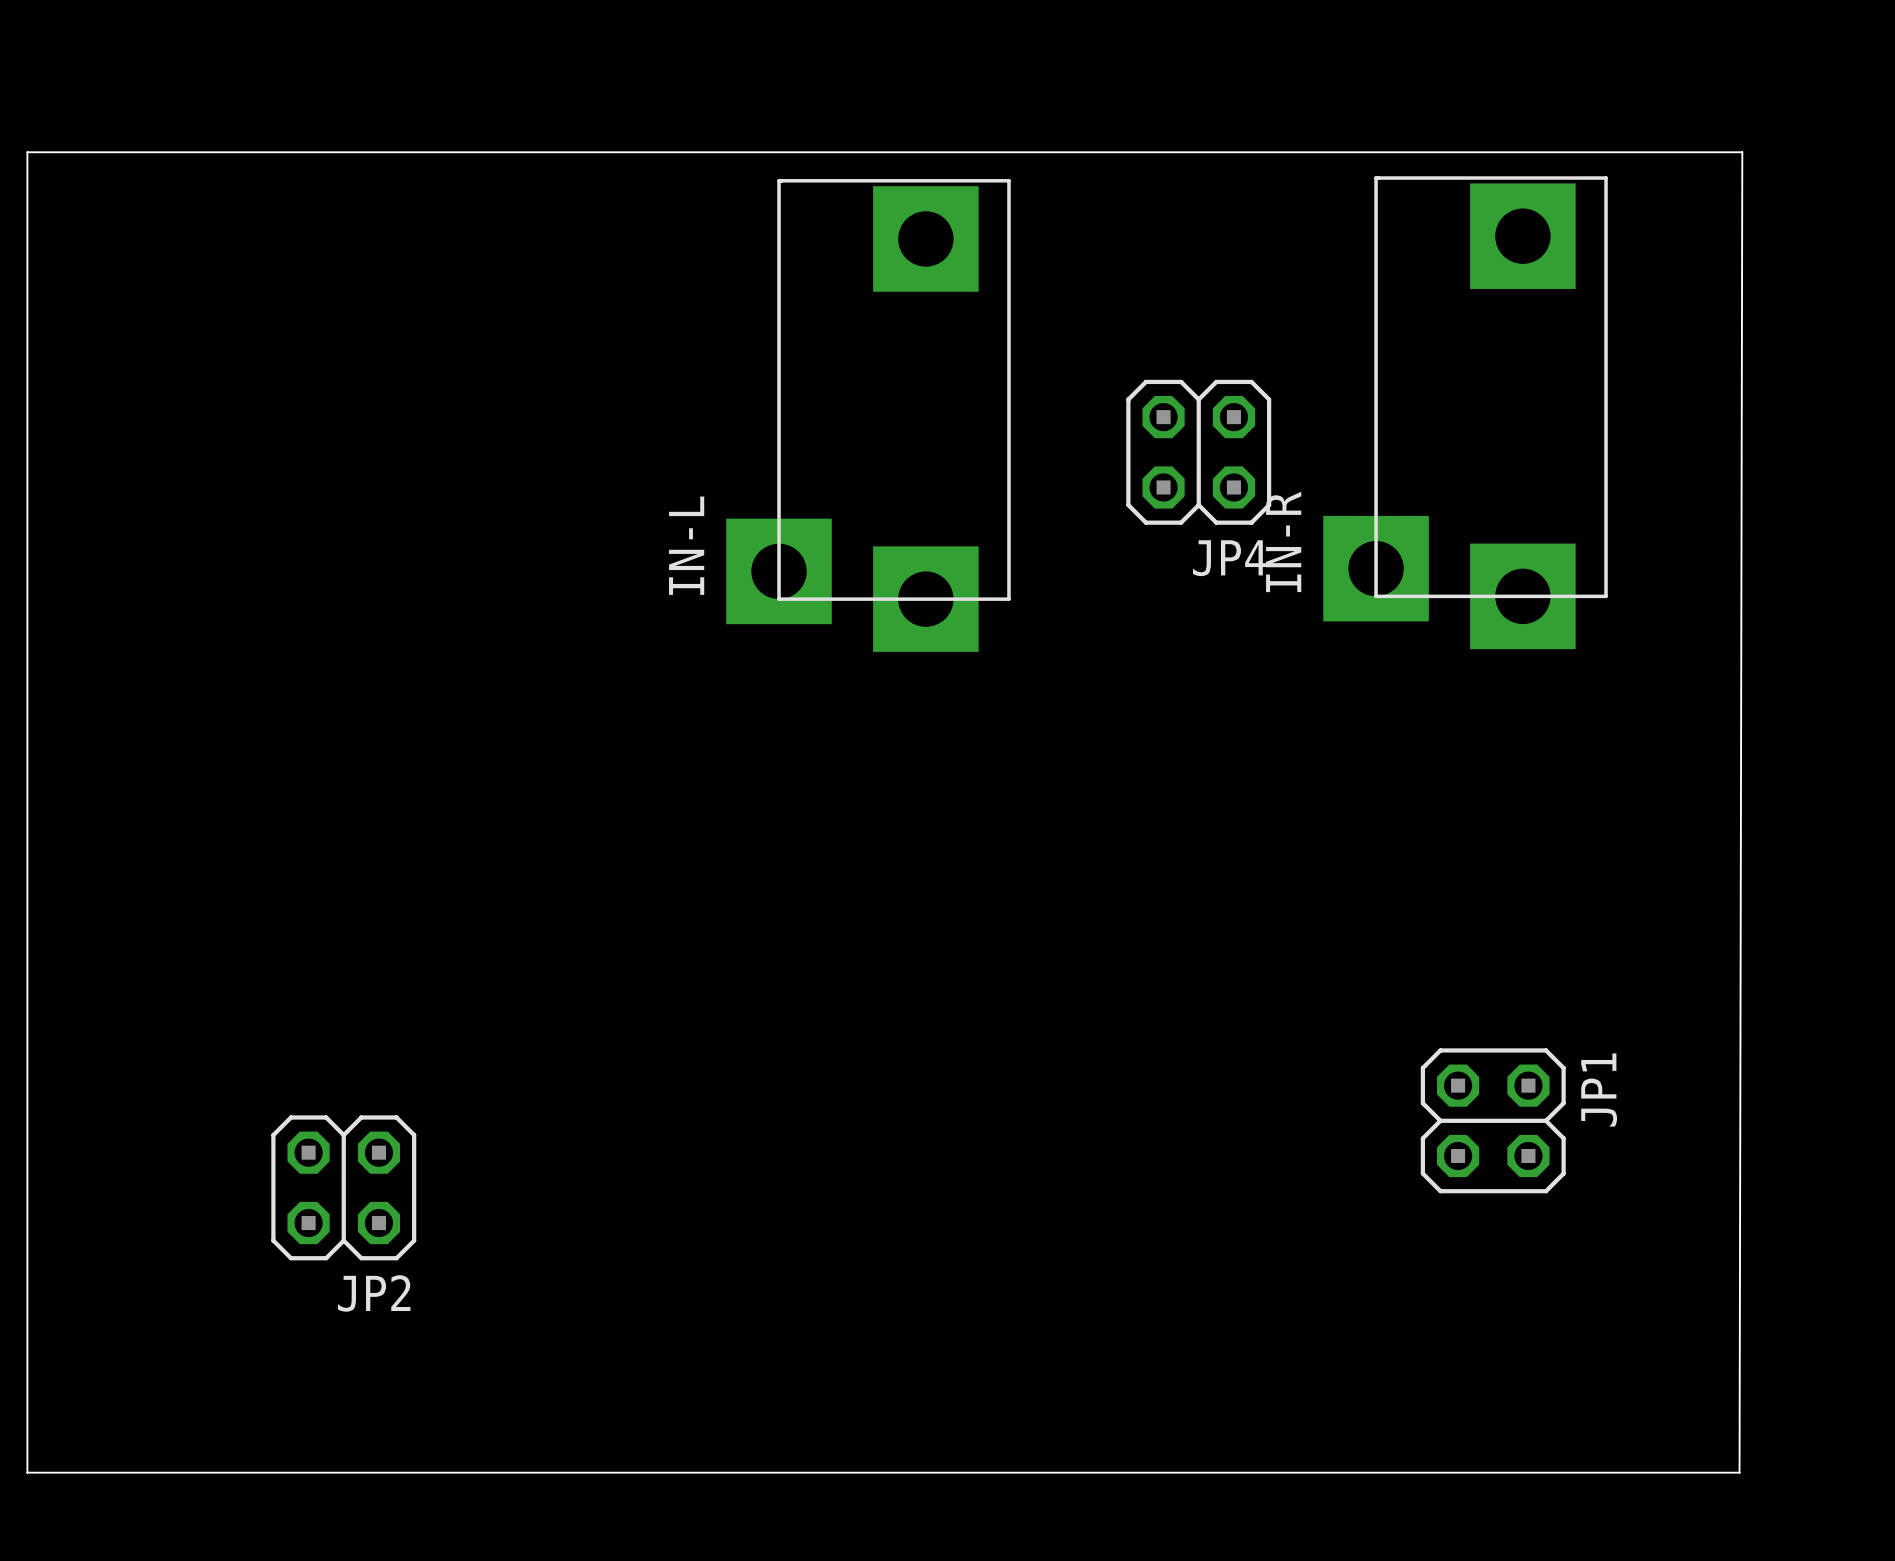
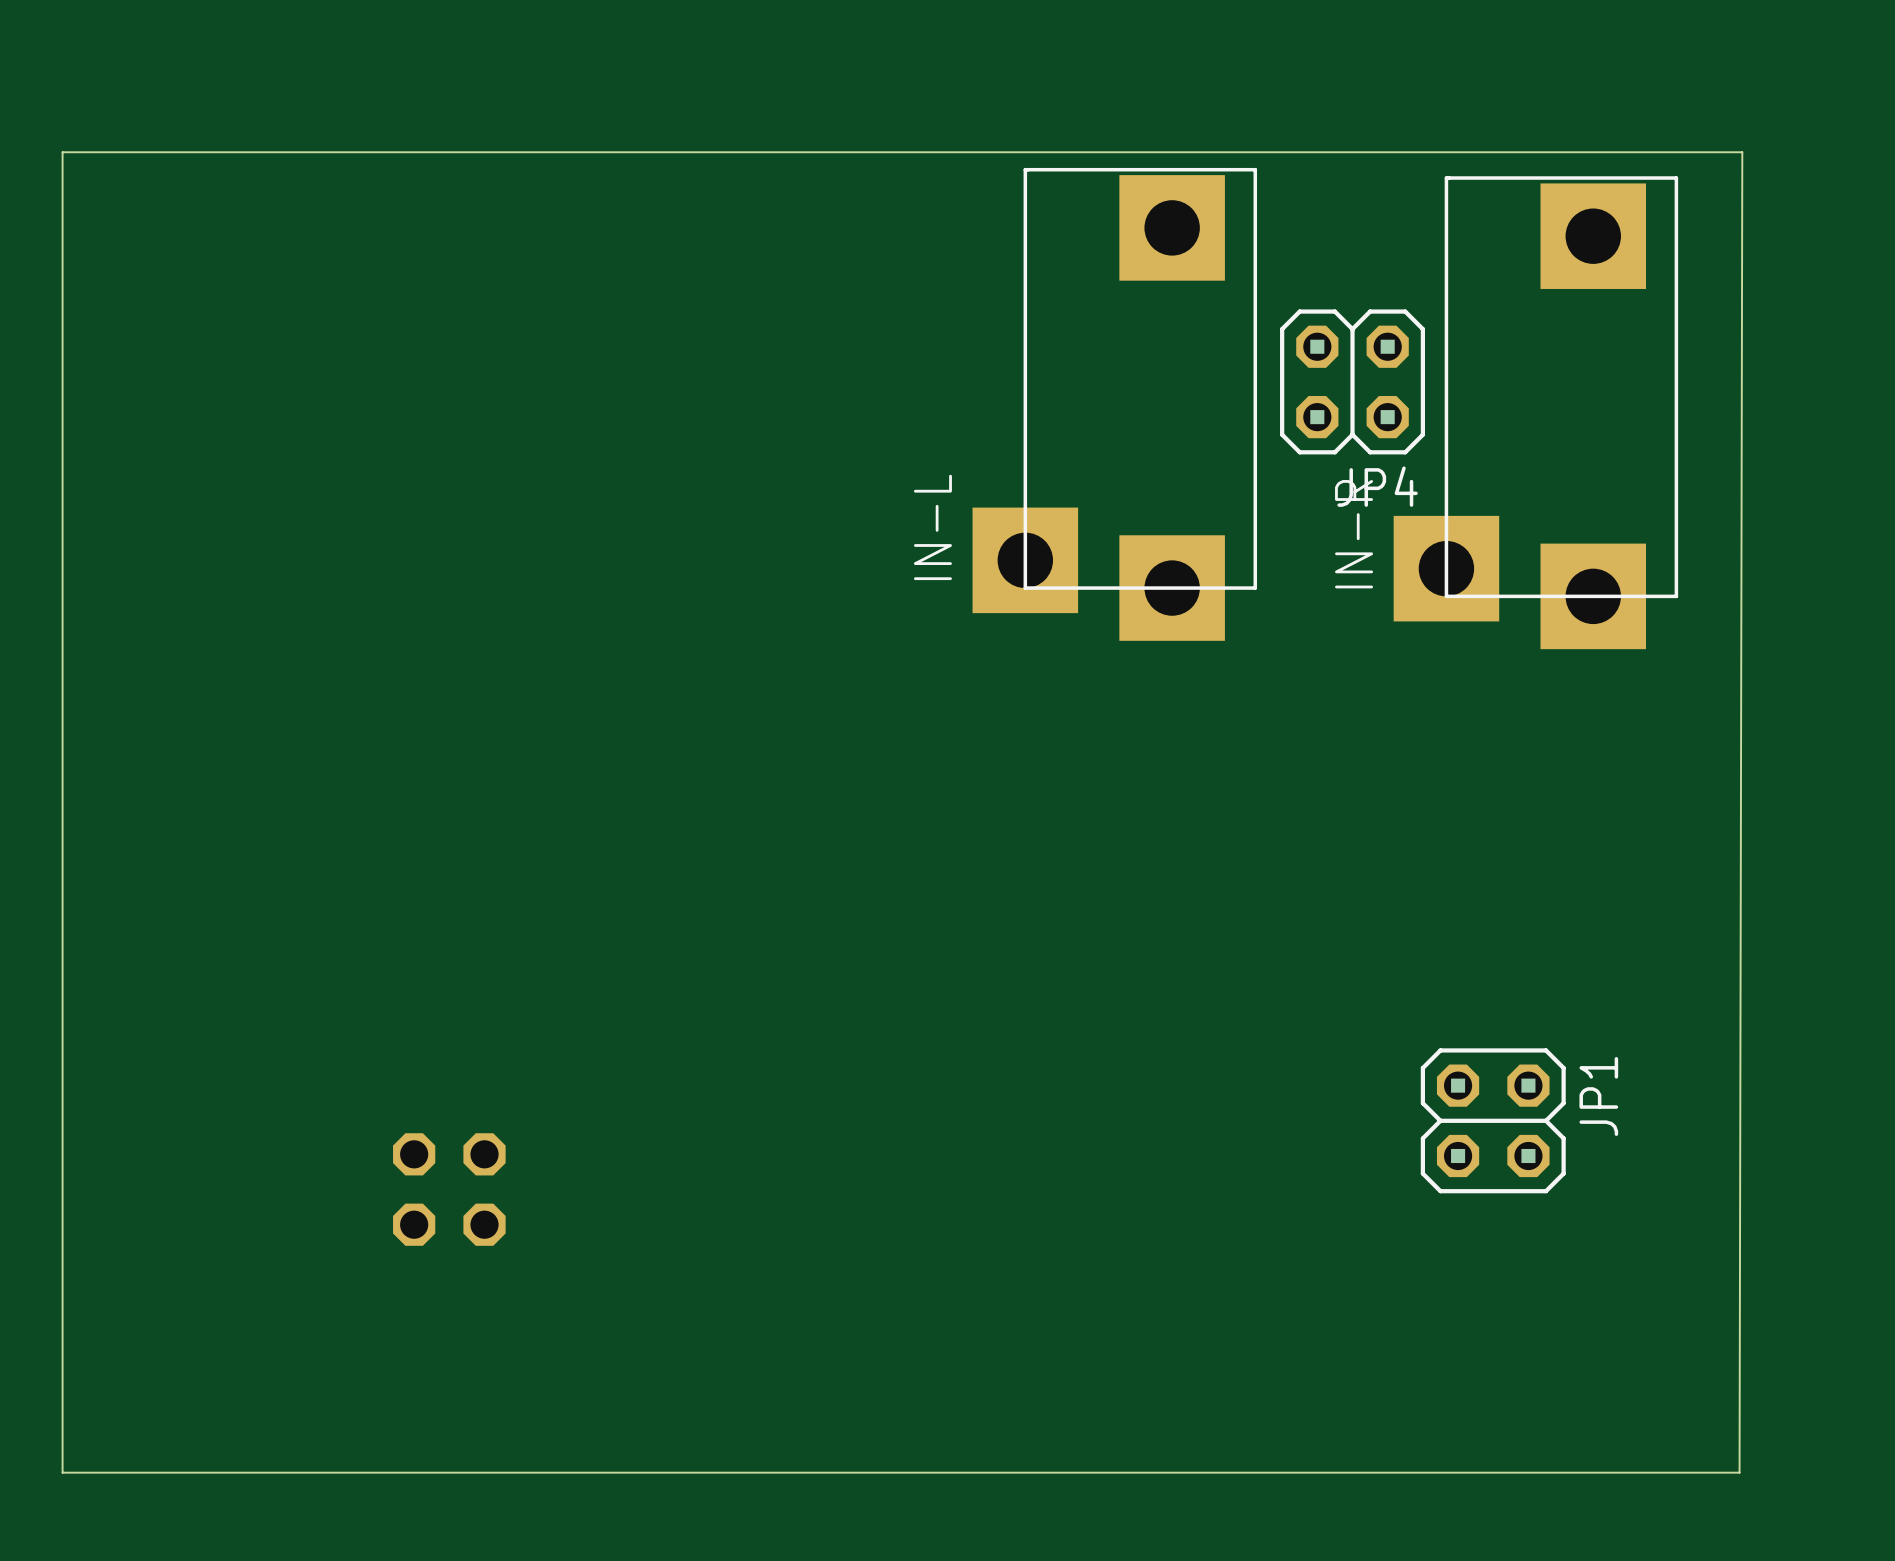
board edge: (62, 152) (27, 152) (27, 1472) (62, 1472) -> (62, 152) (62, 1472)
IN-R position: (1465, 412) -> (1535, 412)
IN-L position: (868, 415) -> (1114, 404)
JP4 position: (1198, 452) -> (1352, 381)
JP2 side: bottom (343, 1187) -> top (449, 1189)

